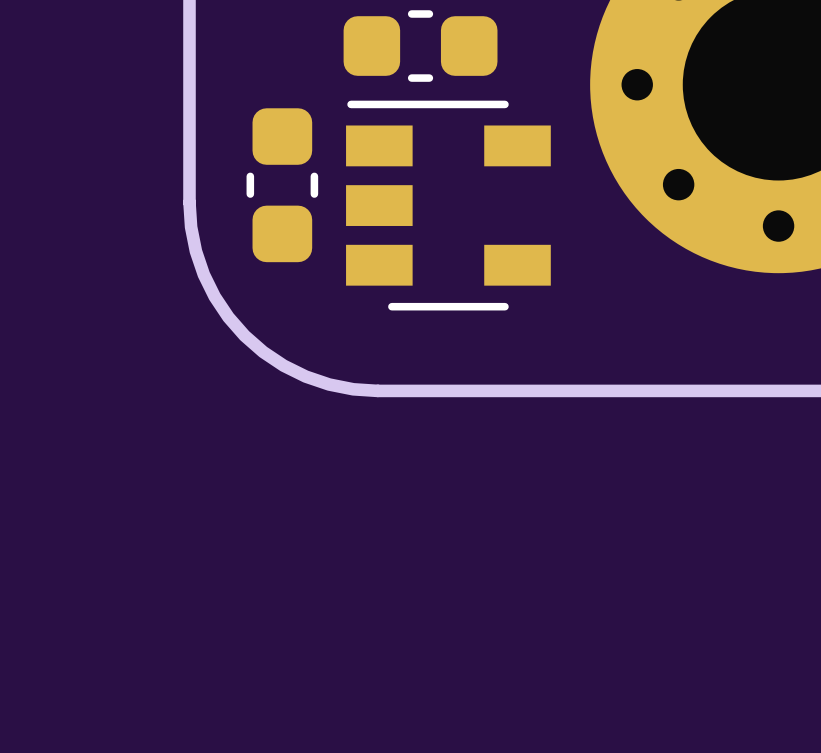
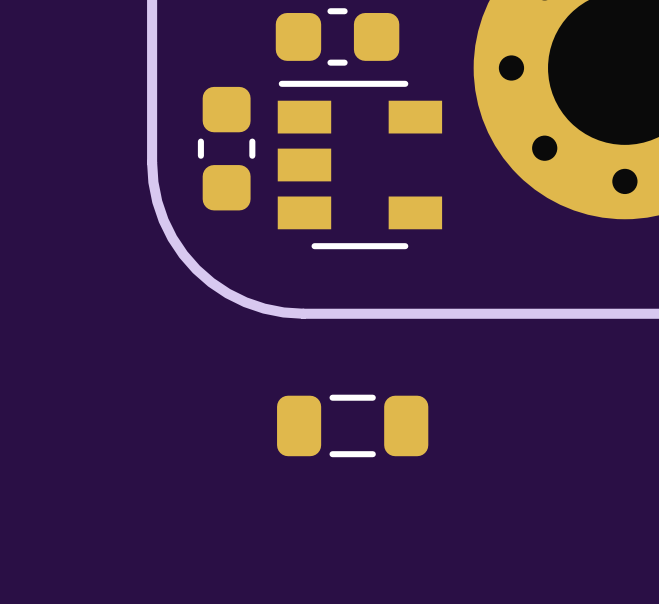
part: none -> (352, 425)

